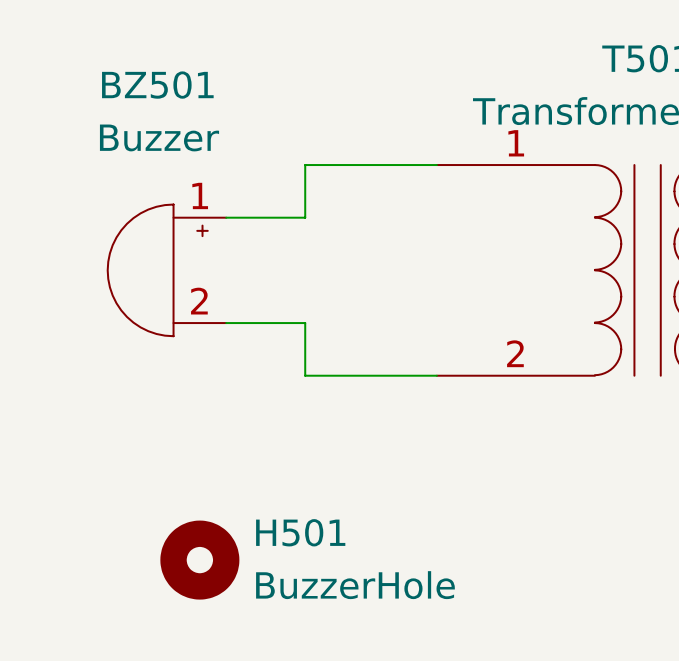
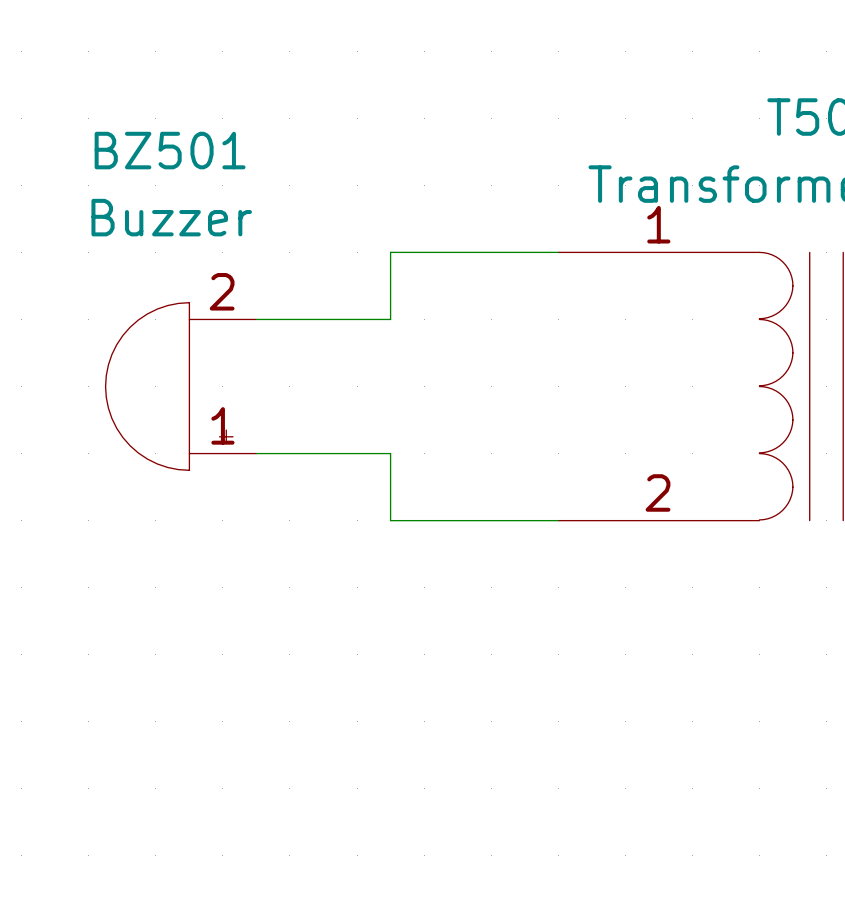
BZ501 flip: as is (157, 270) -> up-down (169, 386)
H501: BuzzerHole (199, 560) -> none

